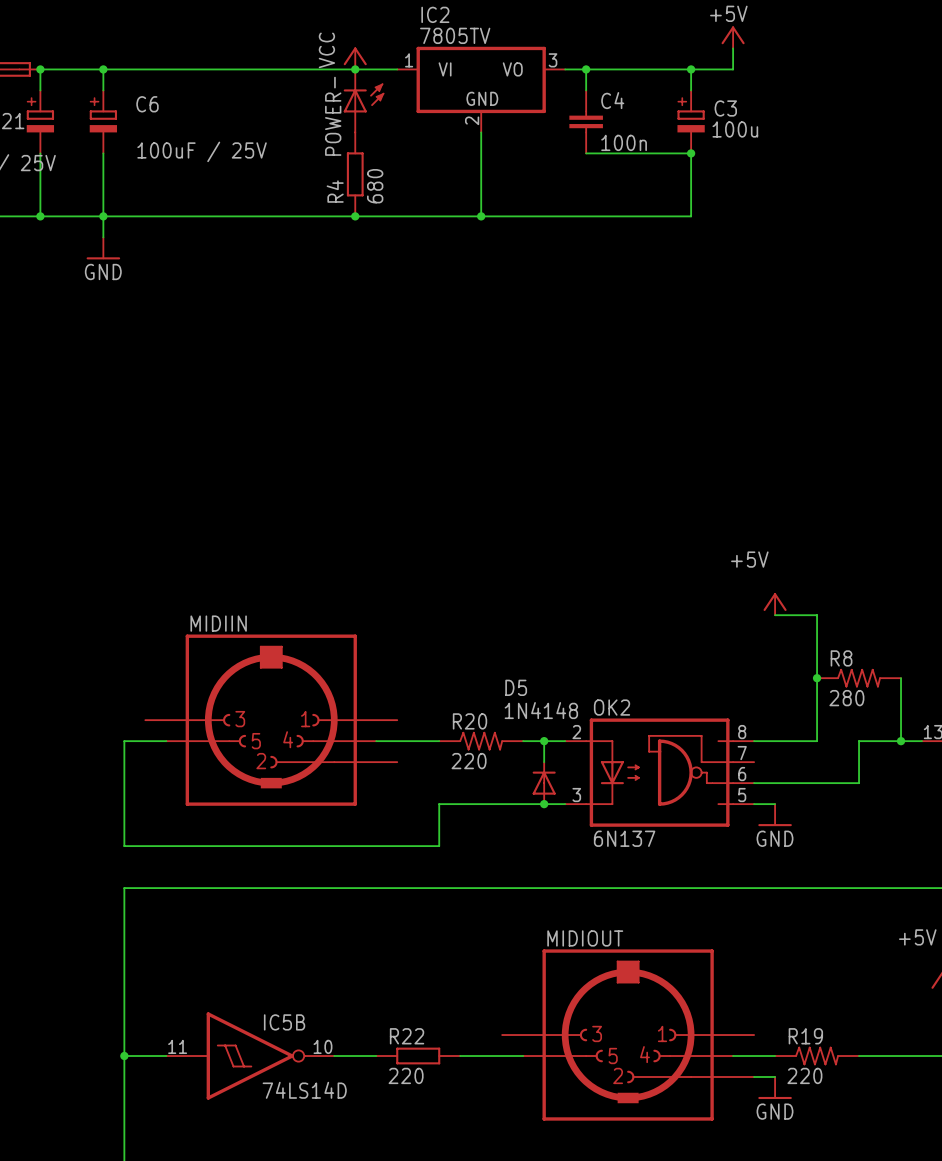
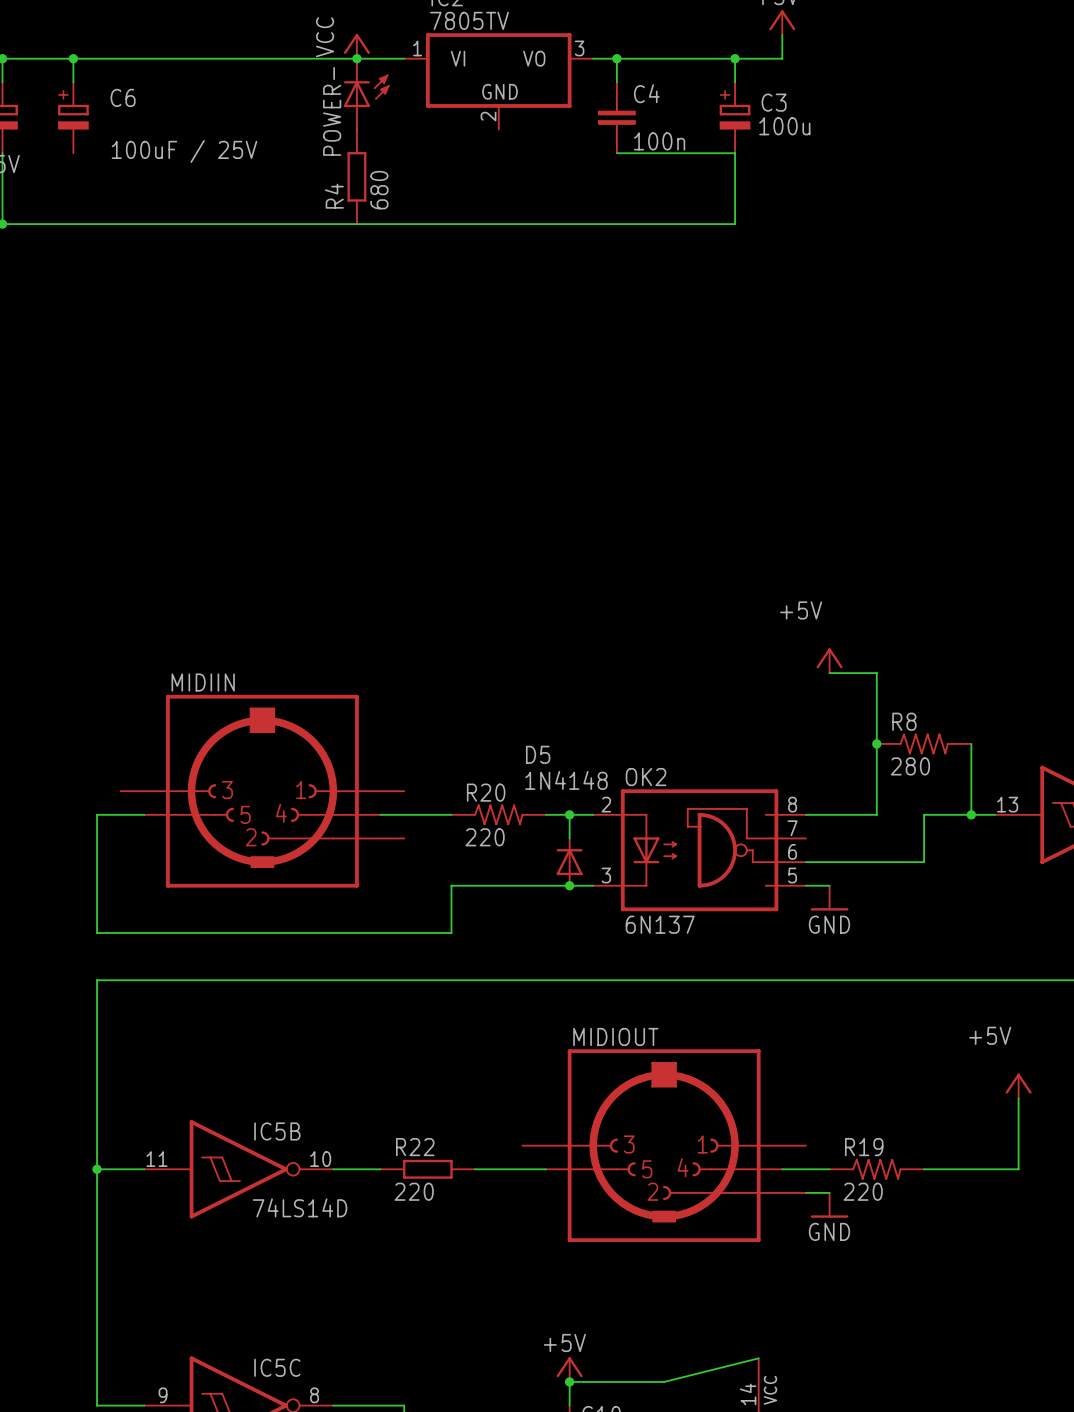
wire: (481, 132) (481, 216) -> none
wire: (103, 153) (103, 237) -> none
junction: (691, 153) -> none
junction: (103, 216) -> none
junction: (355, 216) -> none
junction: (481, 216) -> none
power symbol: GND (103, 248) -> none

